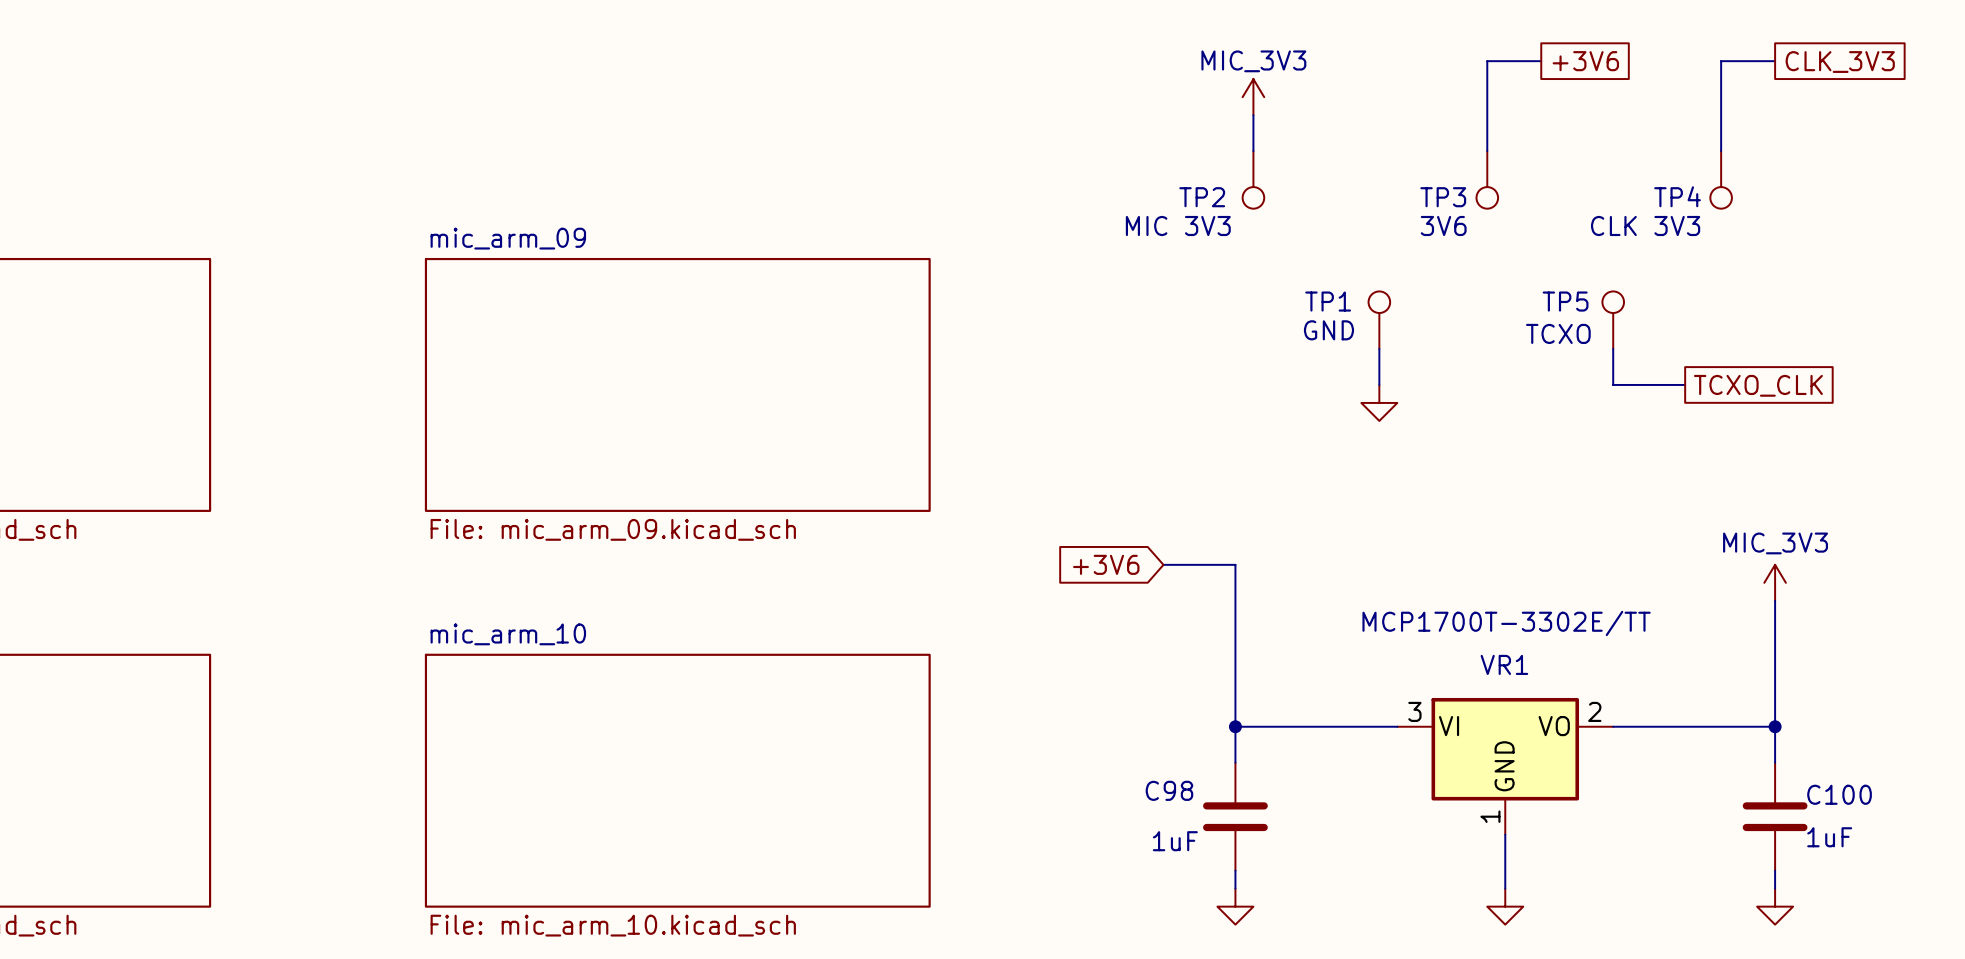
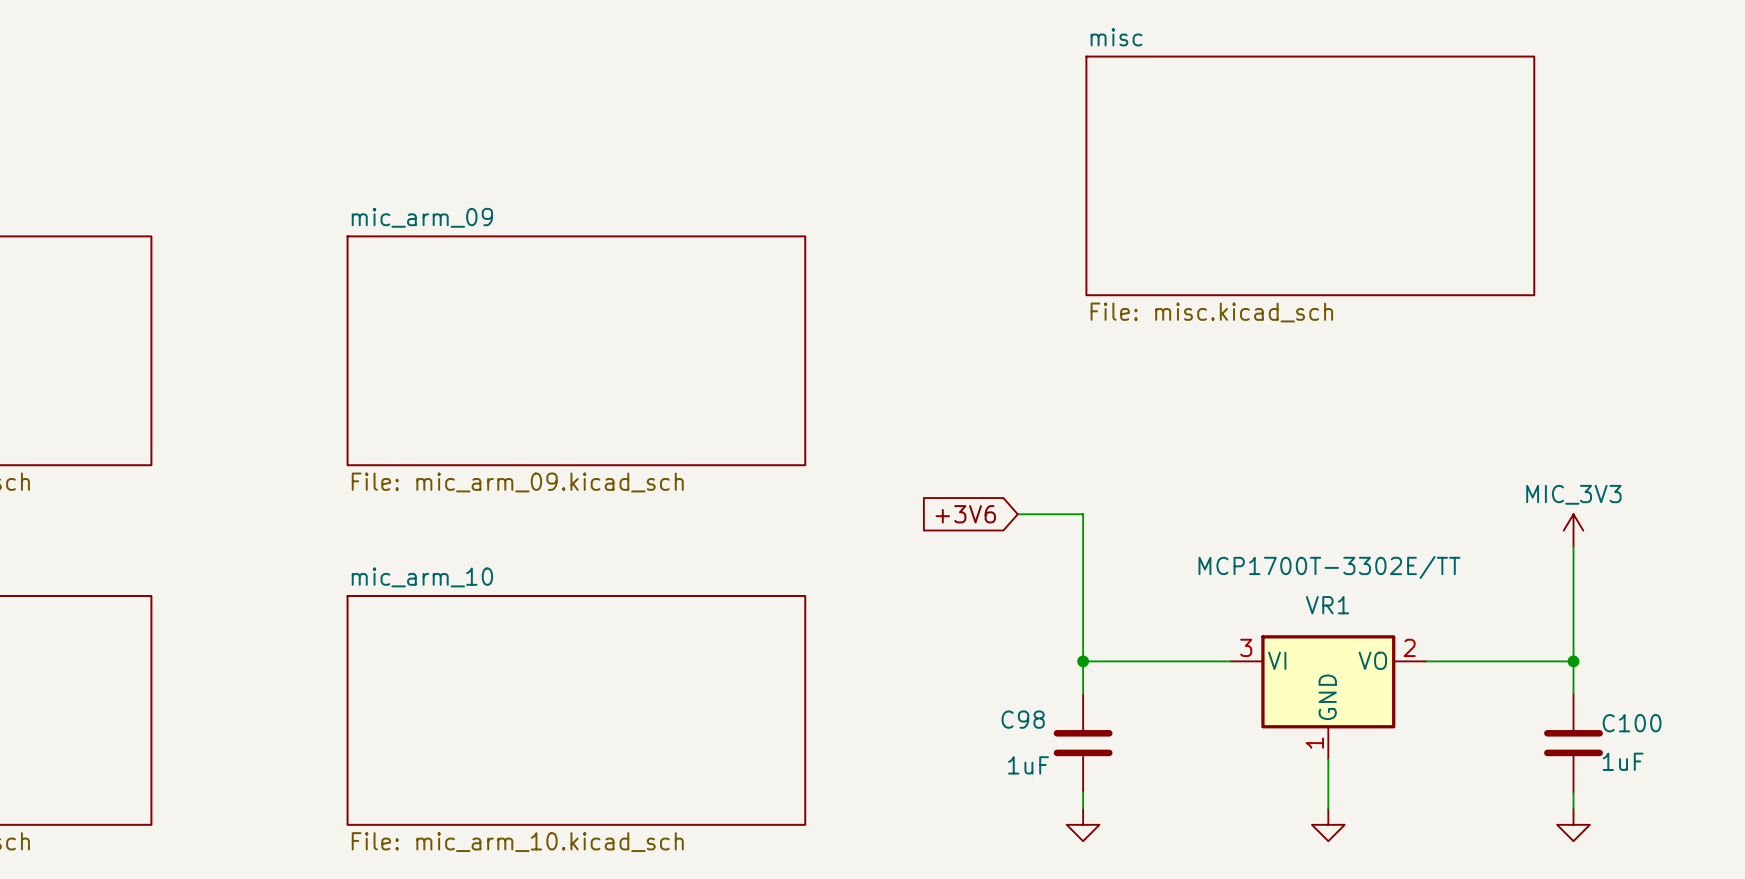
wire: (1541, 61) (1487, 61) (1487, 151) -> none
global label: +3V6 (1585, 61) -> none
wire: (1775, 61) (1721, 61) (1721, 151) -> none
global label: CLK_3V3 (1840, 62) -> none
power symbol: MIC_3V3 (1253, 97) -> none
wire: (1253, 115) (1253, 151) -> none
TP2: MIC 3V3 (1253, 179) -> none
TP3: 3V6 (1487, 179) -> none
TP4: CLK 3V3 (1721, 179) -> none
sheet misc: none -> File: misc.kicad_sch (1310, 175)
TP1: GND (1379, 320) -> none
TP5: TCXO (1613, 320) -> none
wire: (1379, 348) (1379, 384) -> none
wire: (1613, 348) (1613, 384) (1685, 384) -> none
global label: TCXO_CLK (1758, 385) -> none
power symbol: (1379, 402) -> none

